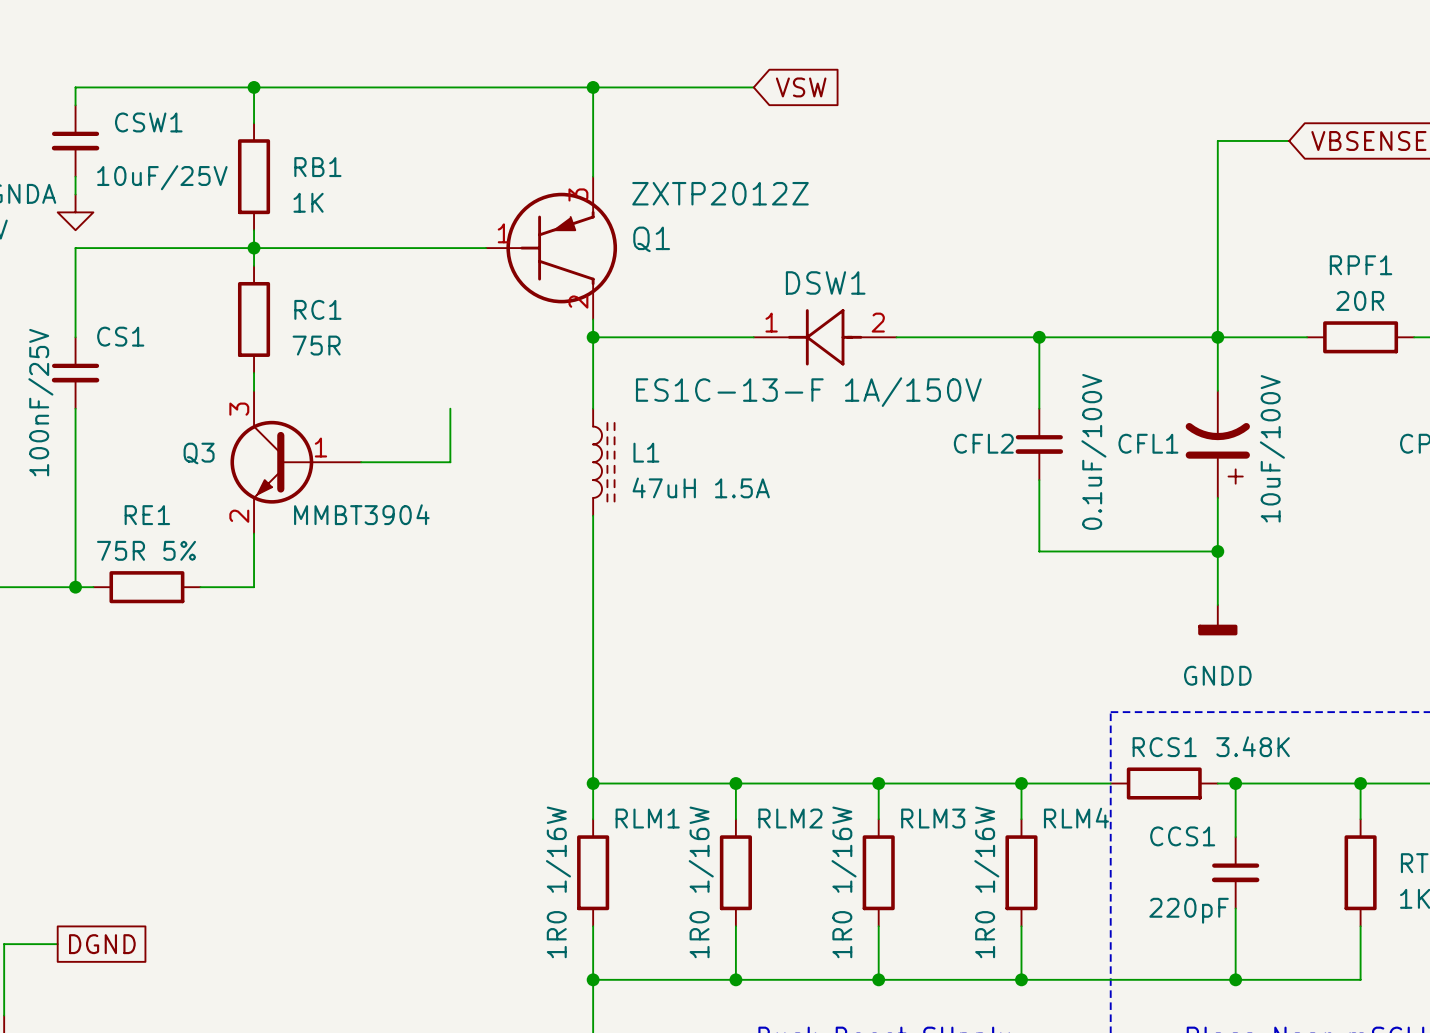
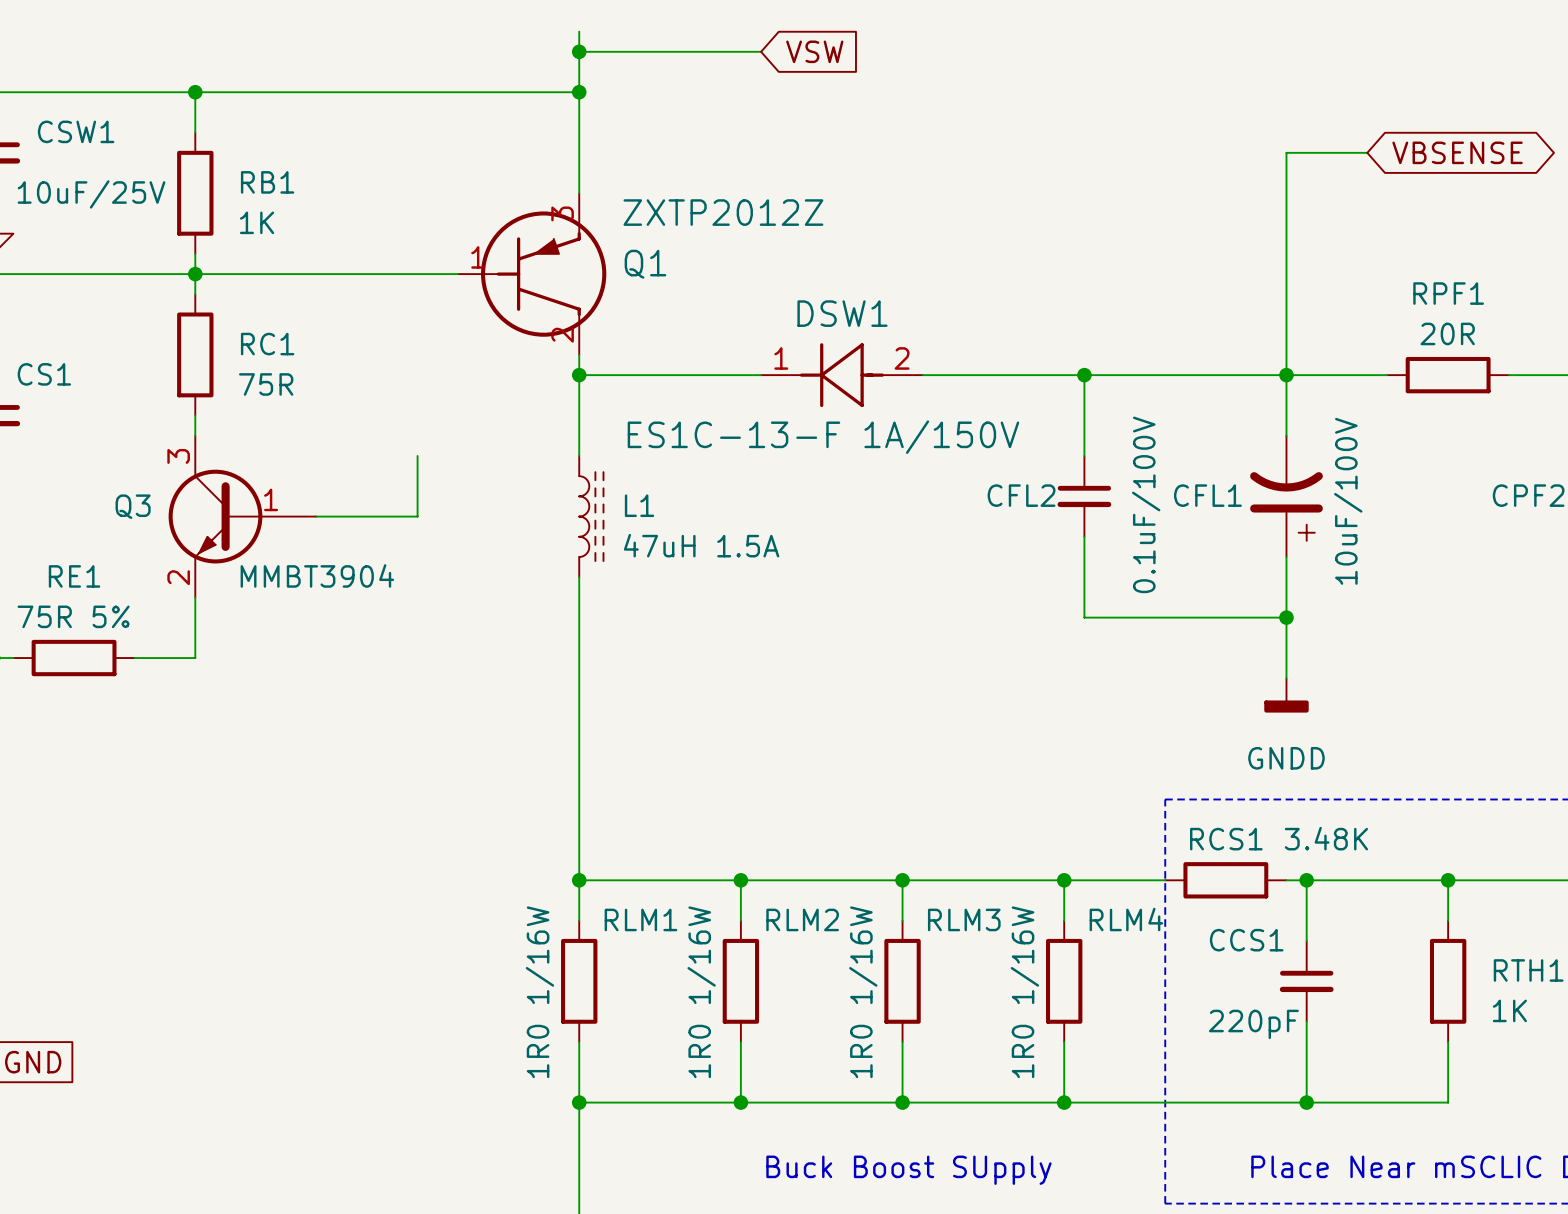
wire: none -> (579, 51) (761, 51)
junction: none -> (579, 51)
wire: (593, 87) (753, 87) -> (579, 92) (579, 31)
global label position: VSW (801, 87) -> VSW (814, 51)

